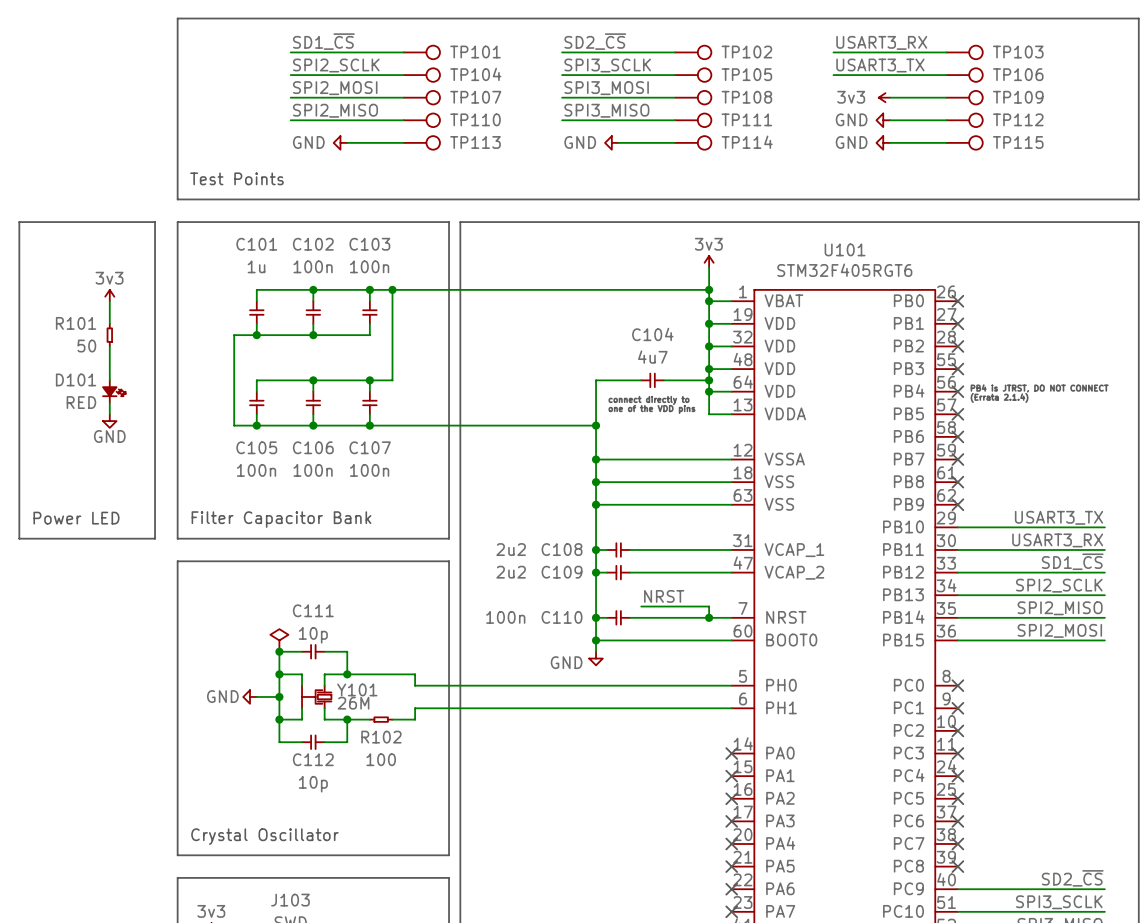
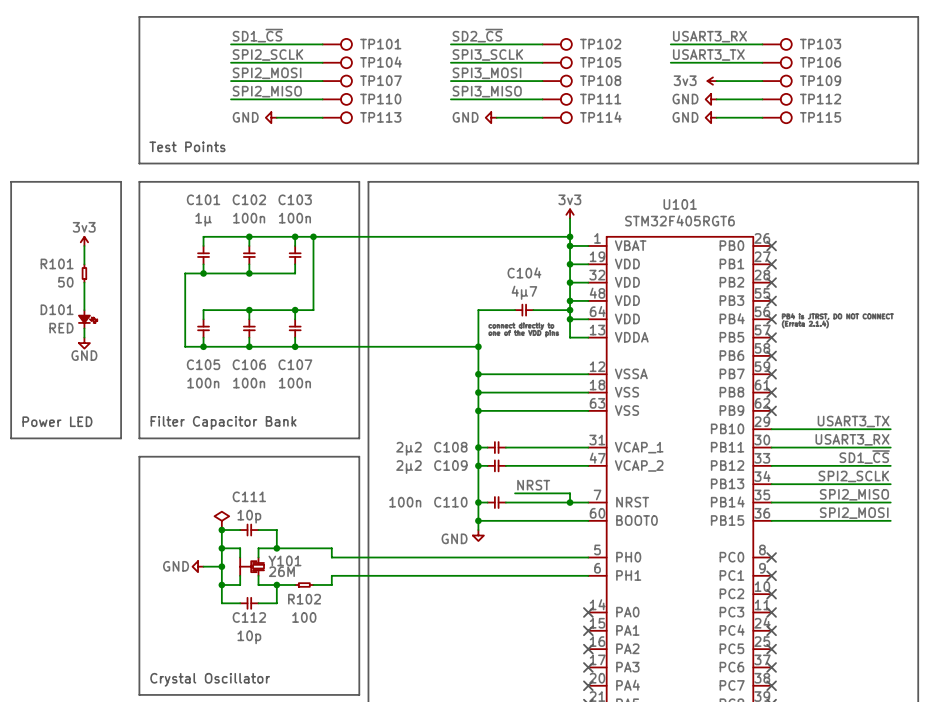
C101 value: 1u (256, 266) -> 1µ (203, 219)
C104 value: 4u7 (652, 357) -> 4µ7 (524, 292)
C108 value: 2u2 (511, 549) -> 2µ2 (408, 448)
C109 value: 2u2 (511, 572) -> 2µ2 (408, 467)

